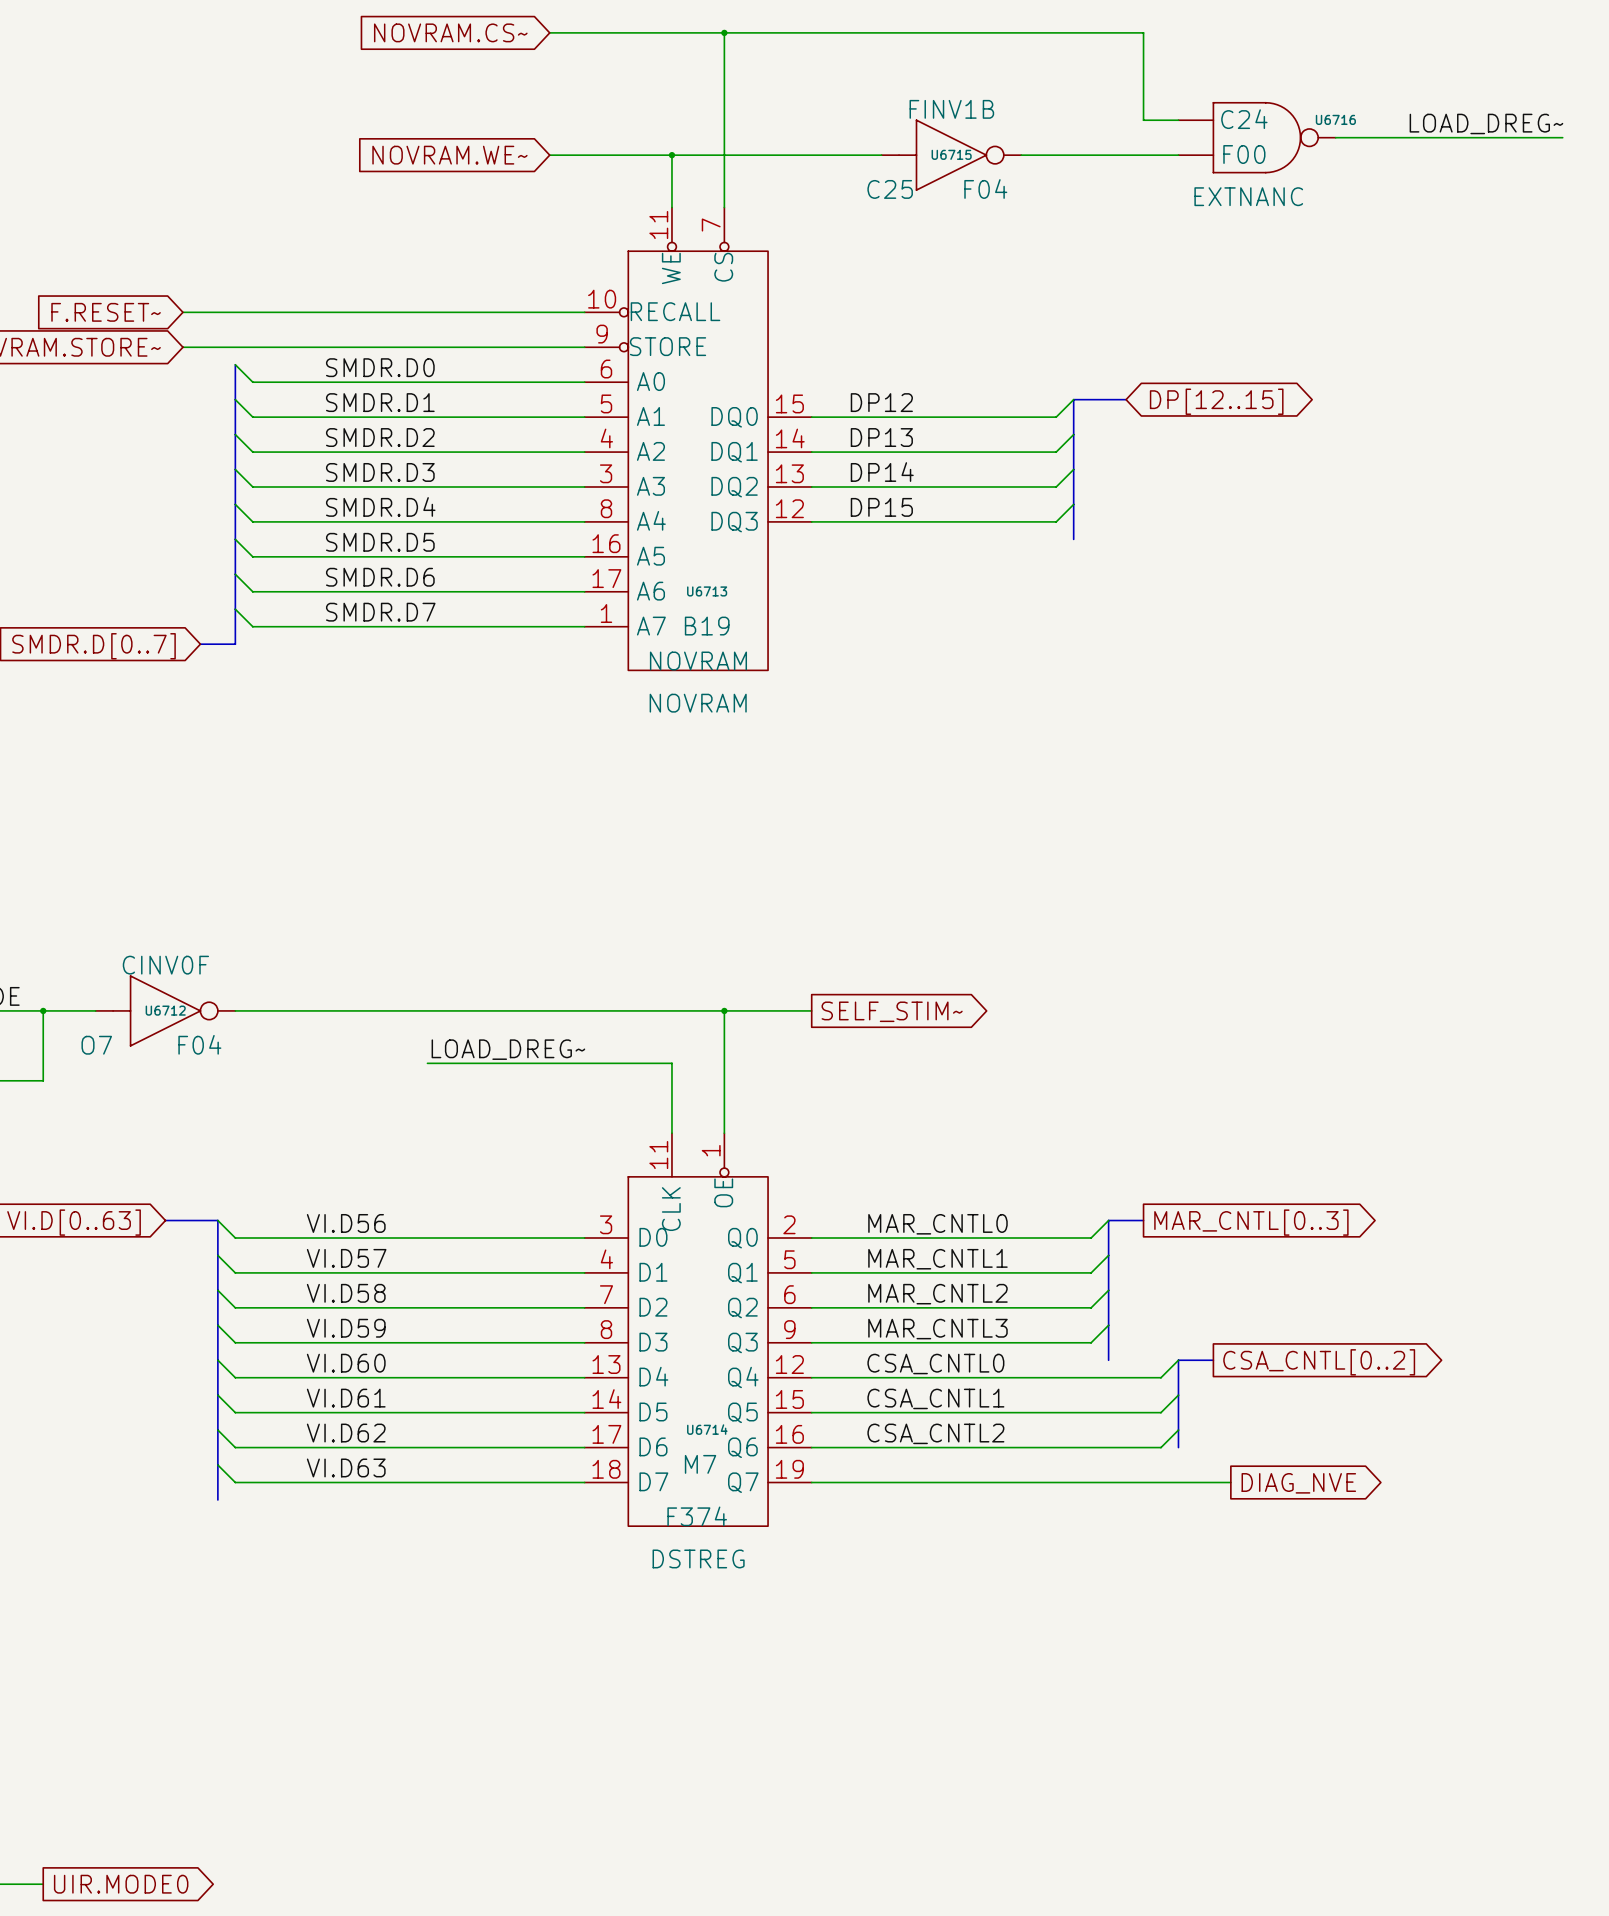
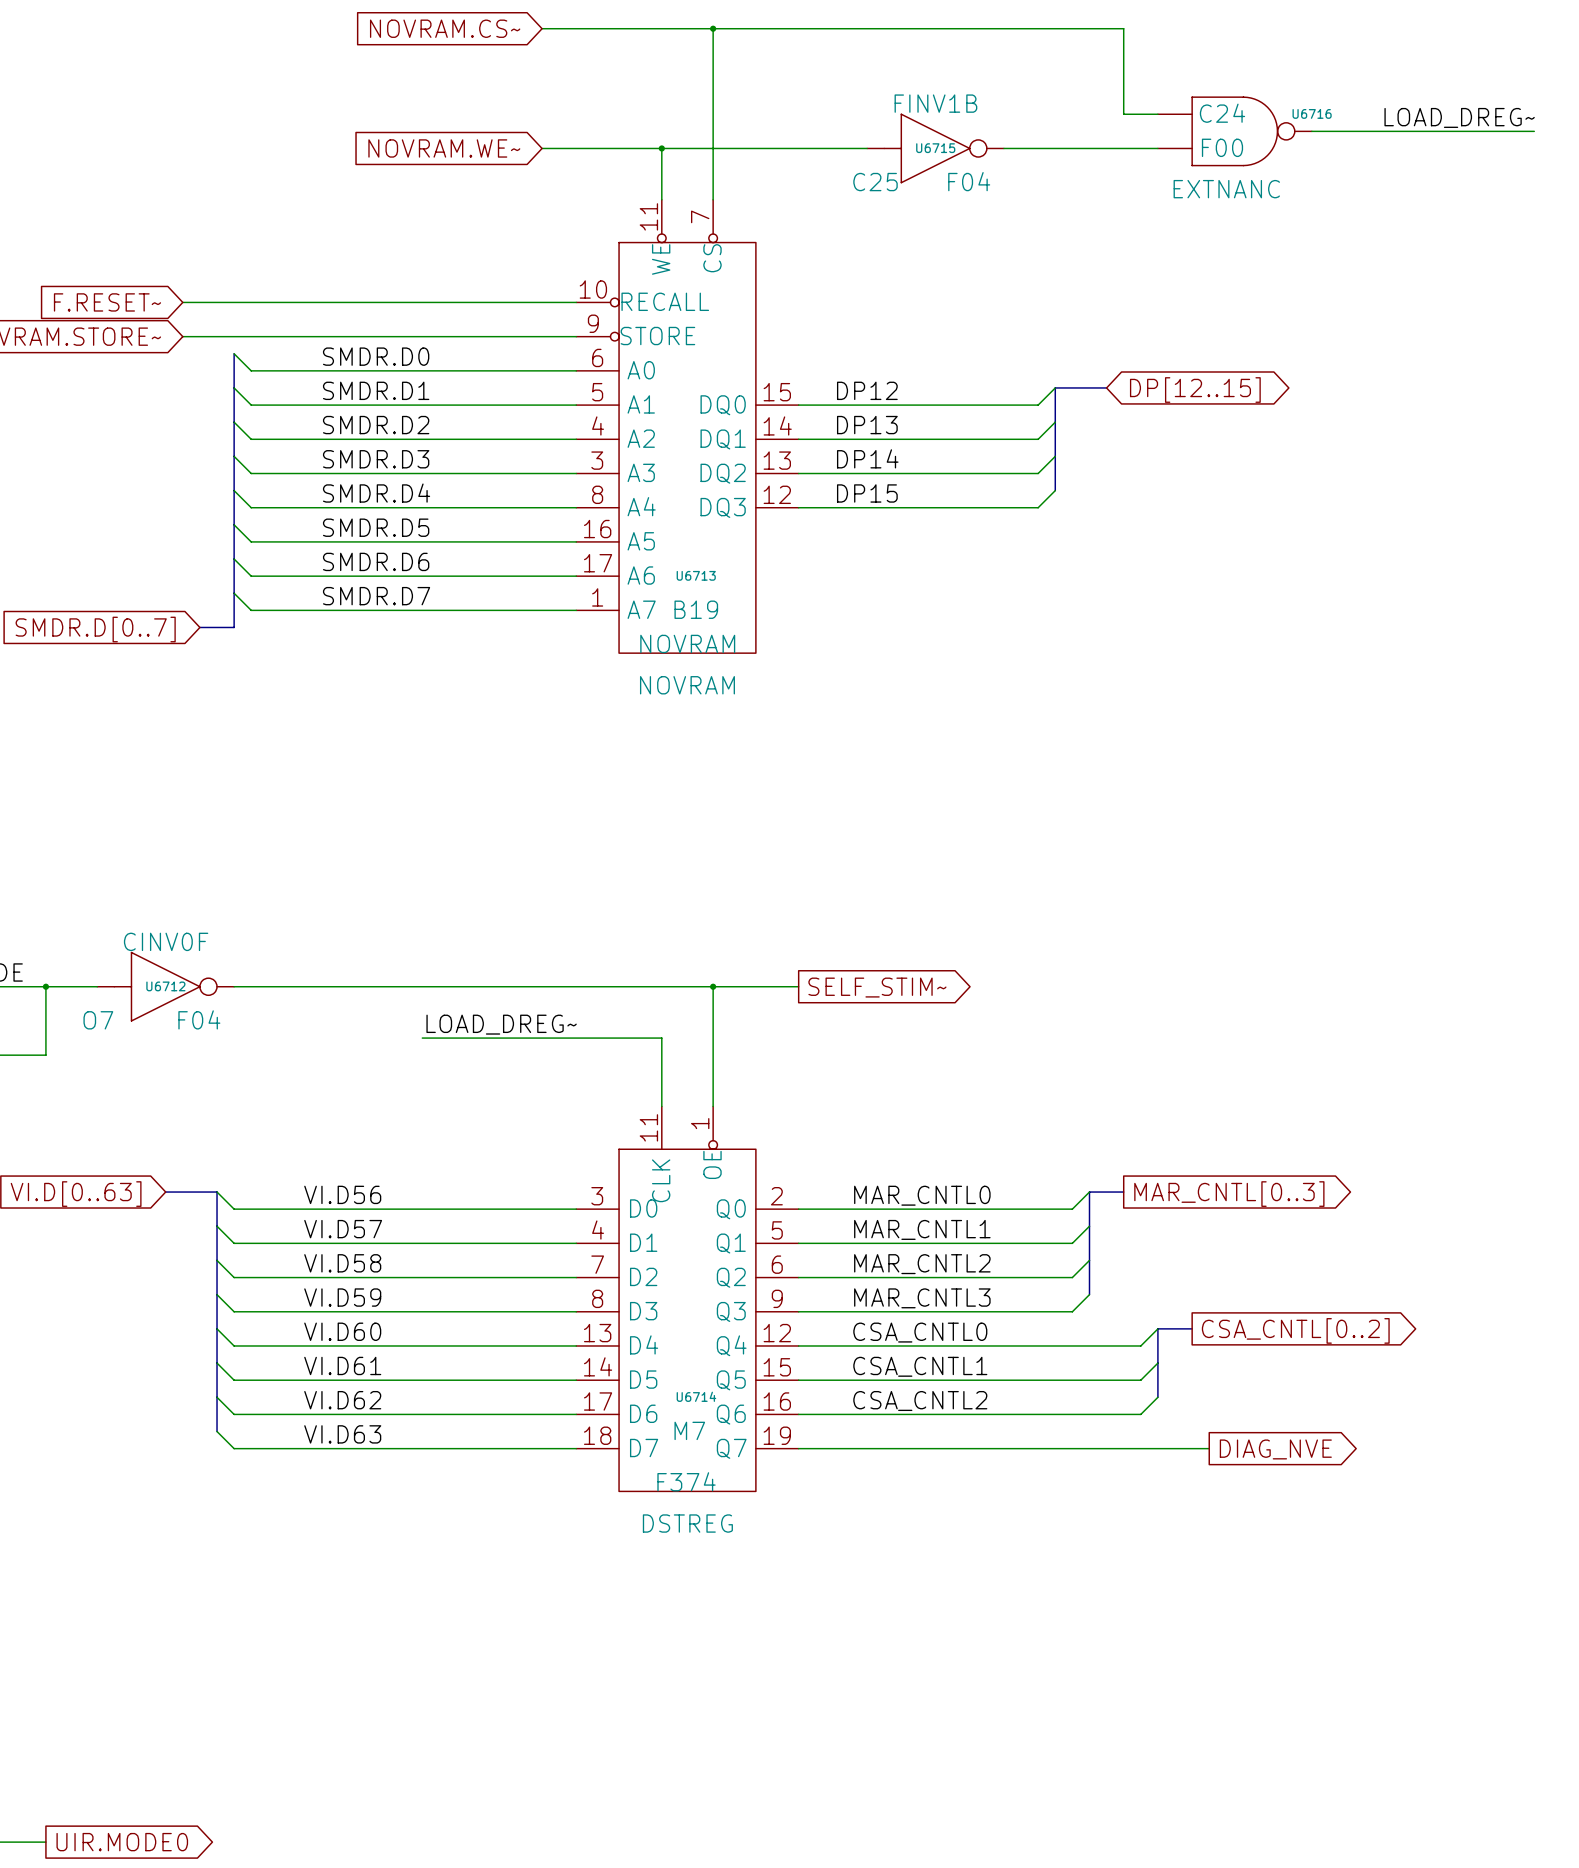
bus: (1073, 504) (1073, 539) -> none
bus: (1108, 1325) (1108, 1360) -> none
bus: (1178, 1430) (1178, 1447) -> none
bus: (217, 1465) (217, 1499) -> none

